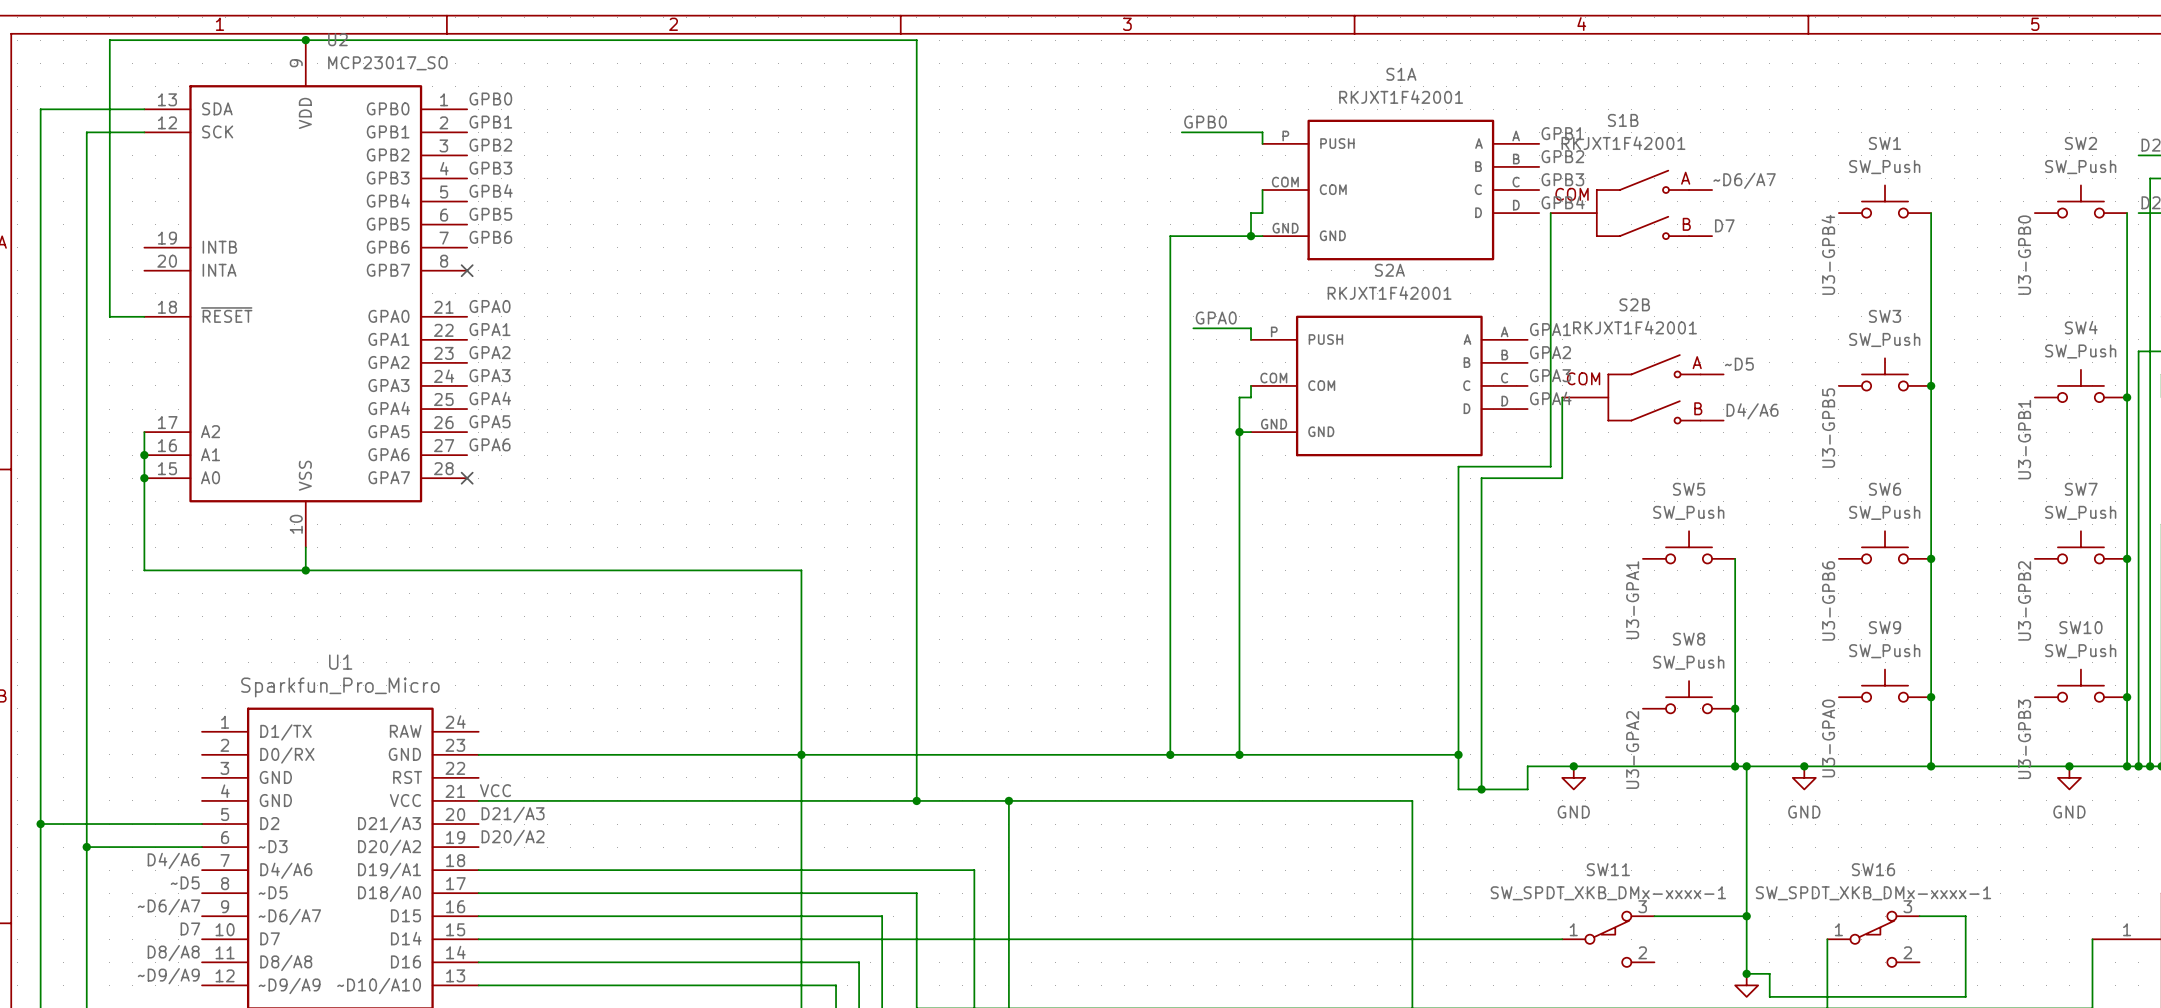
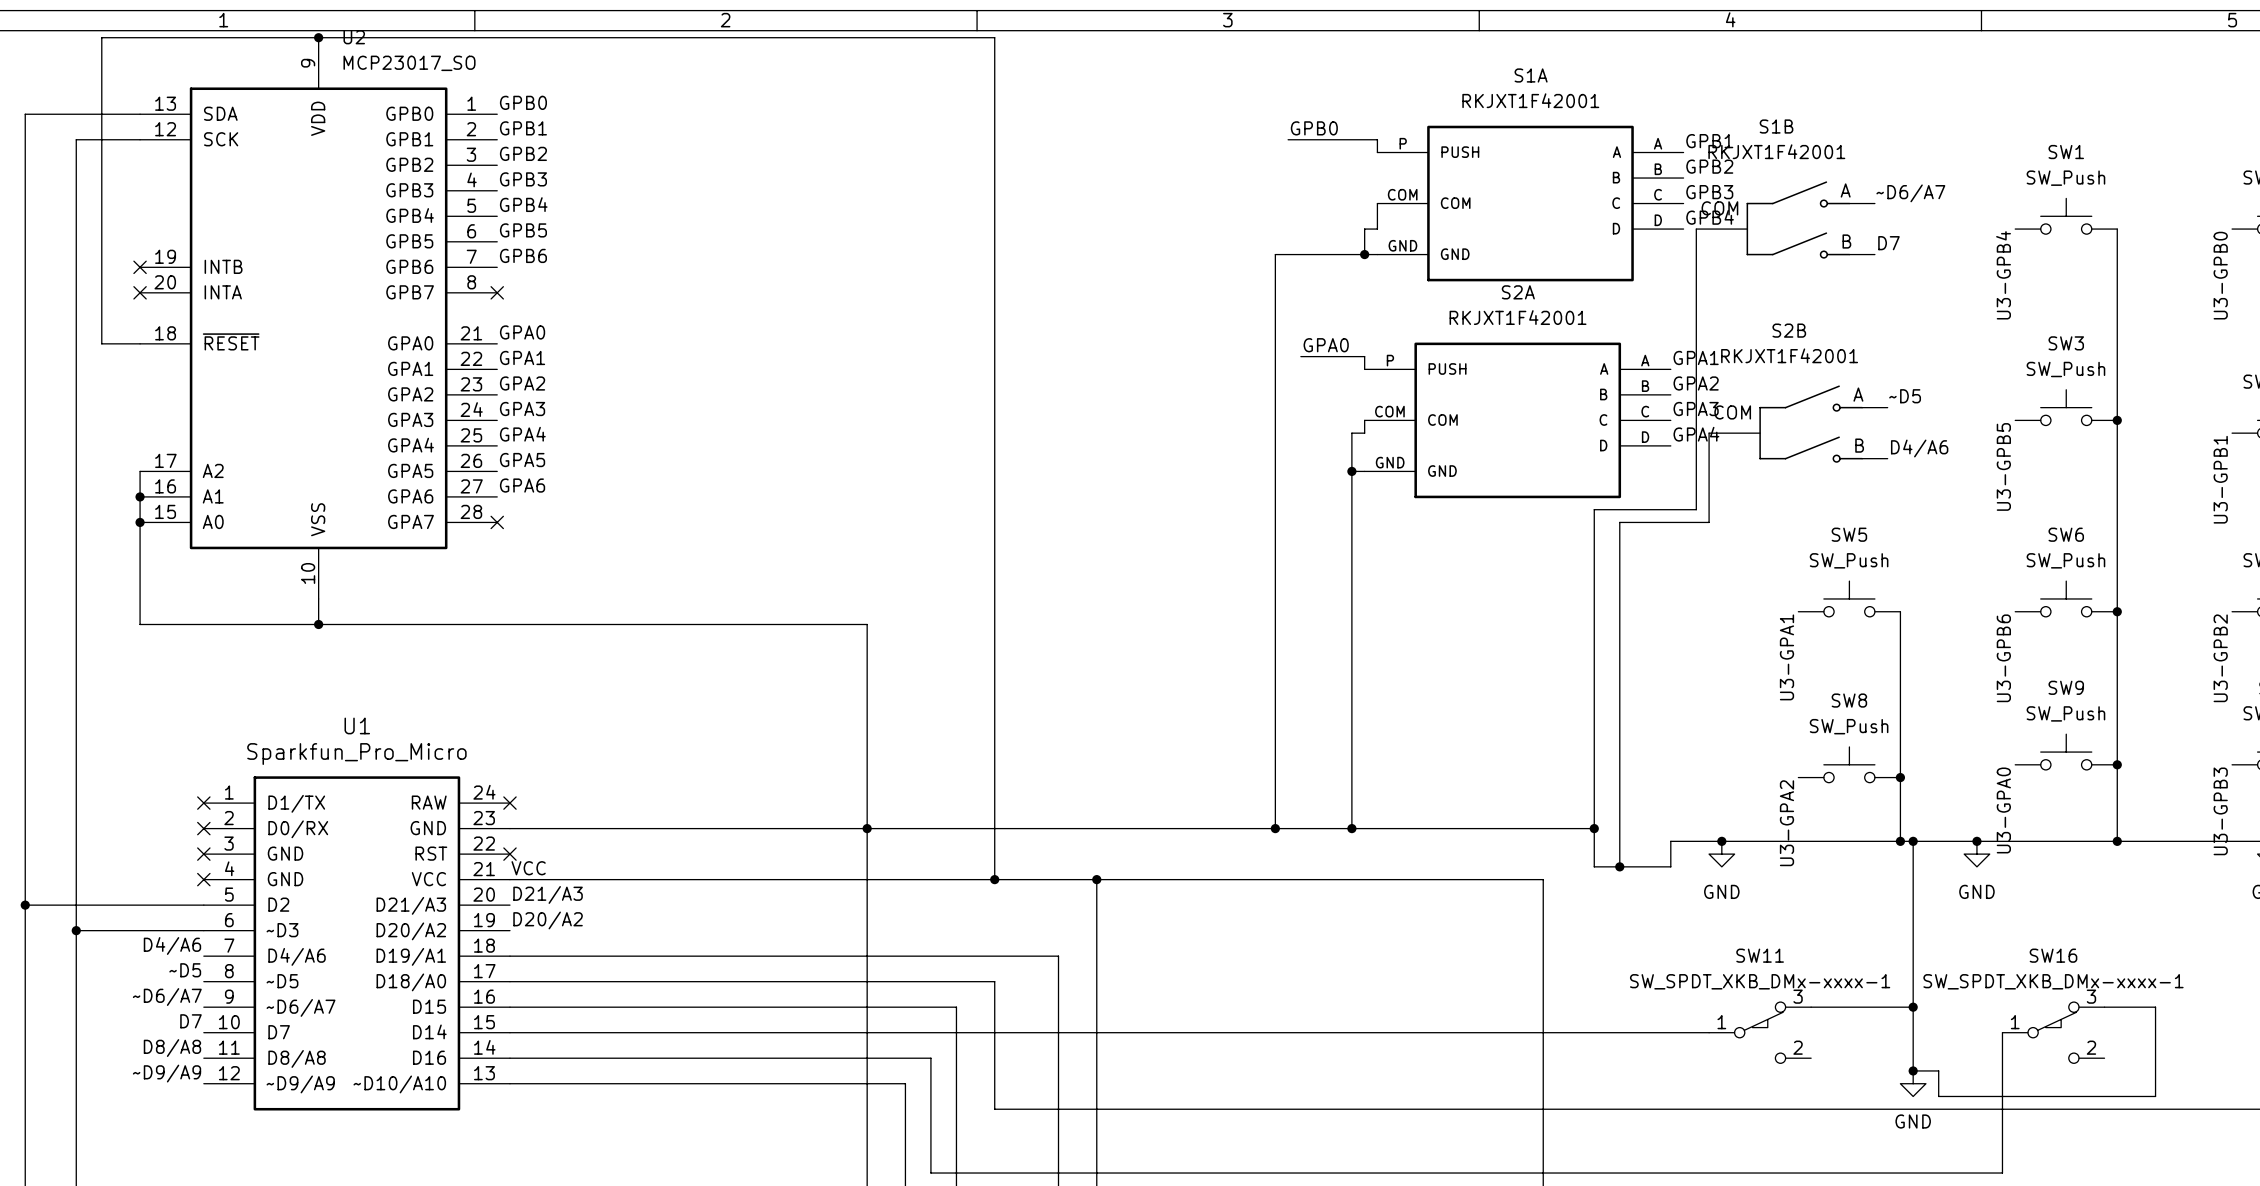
no-connect mark: none -> (140, 267)
no-connect mark: none -> (140, 292)
no-connect mark: none -> (203, 803)
no-connect mark: none -> (509, 803)
no-connect mark: none -> (203, 828)
no-connect mark: none -> (203, 854)
no-connect mark: none -> (509, 854)
no-connect mark: none -> (203, 879)

